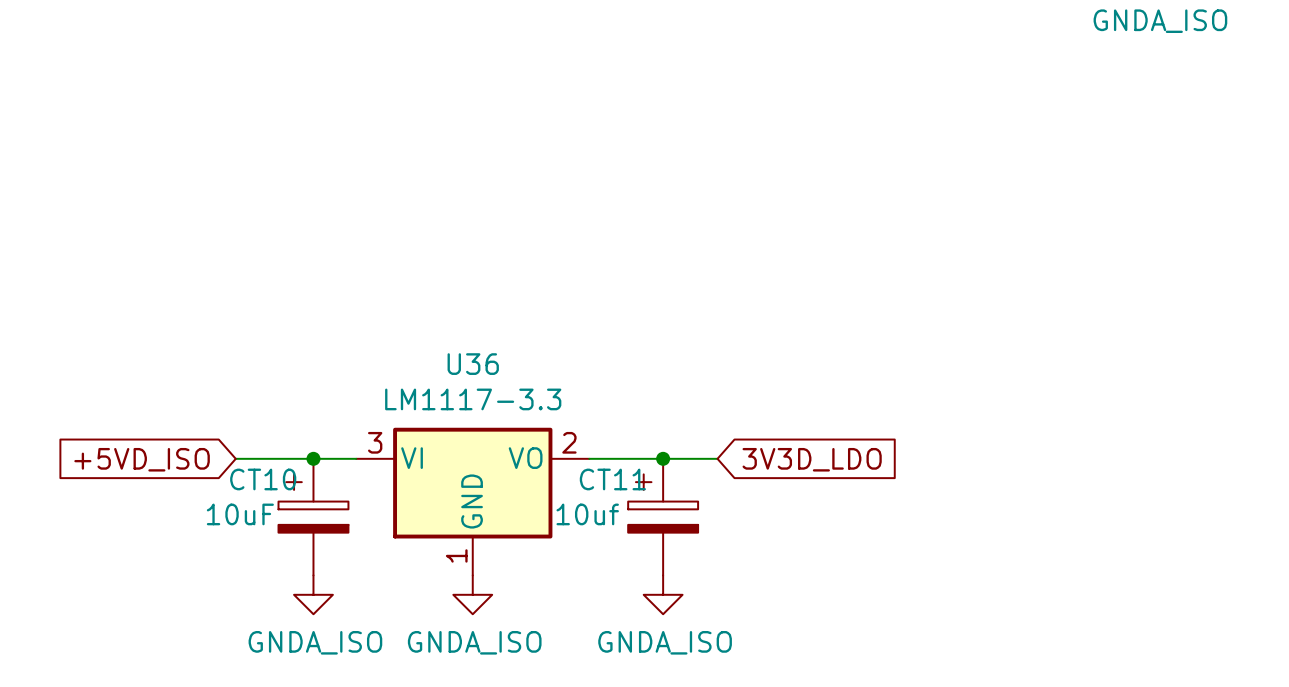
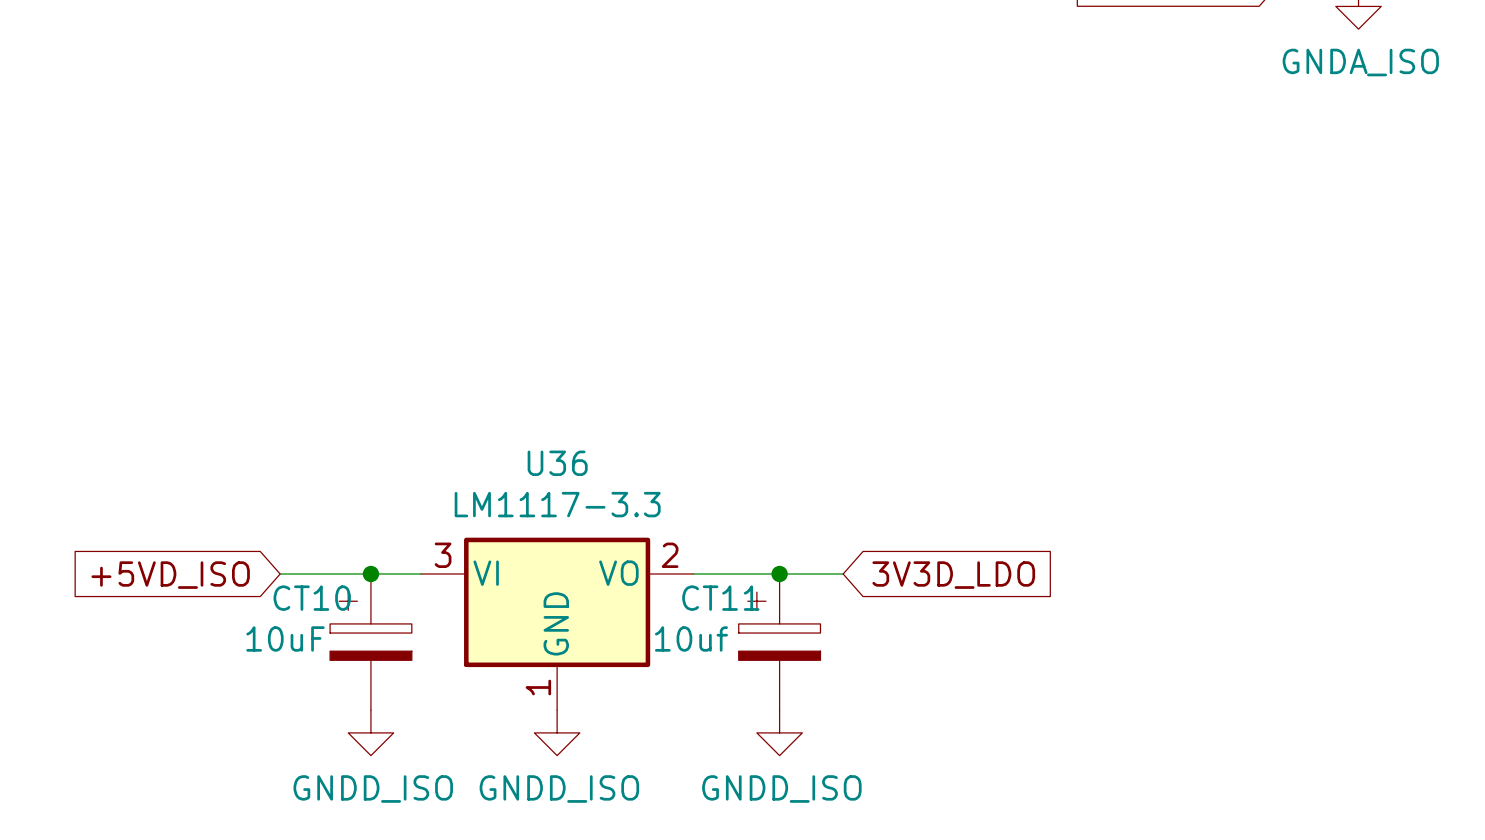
power symbol: GNDA_ISO (313, 594) -> GNDD_ISO (370, 732)
power symbol: GNDA_ISO (472, 594) -> GNDD_ISO (557, 732)
power symbol: GNDA_ISO (663, 594) -> GNDD_ISO (779, 732)

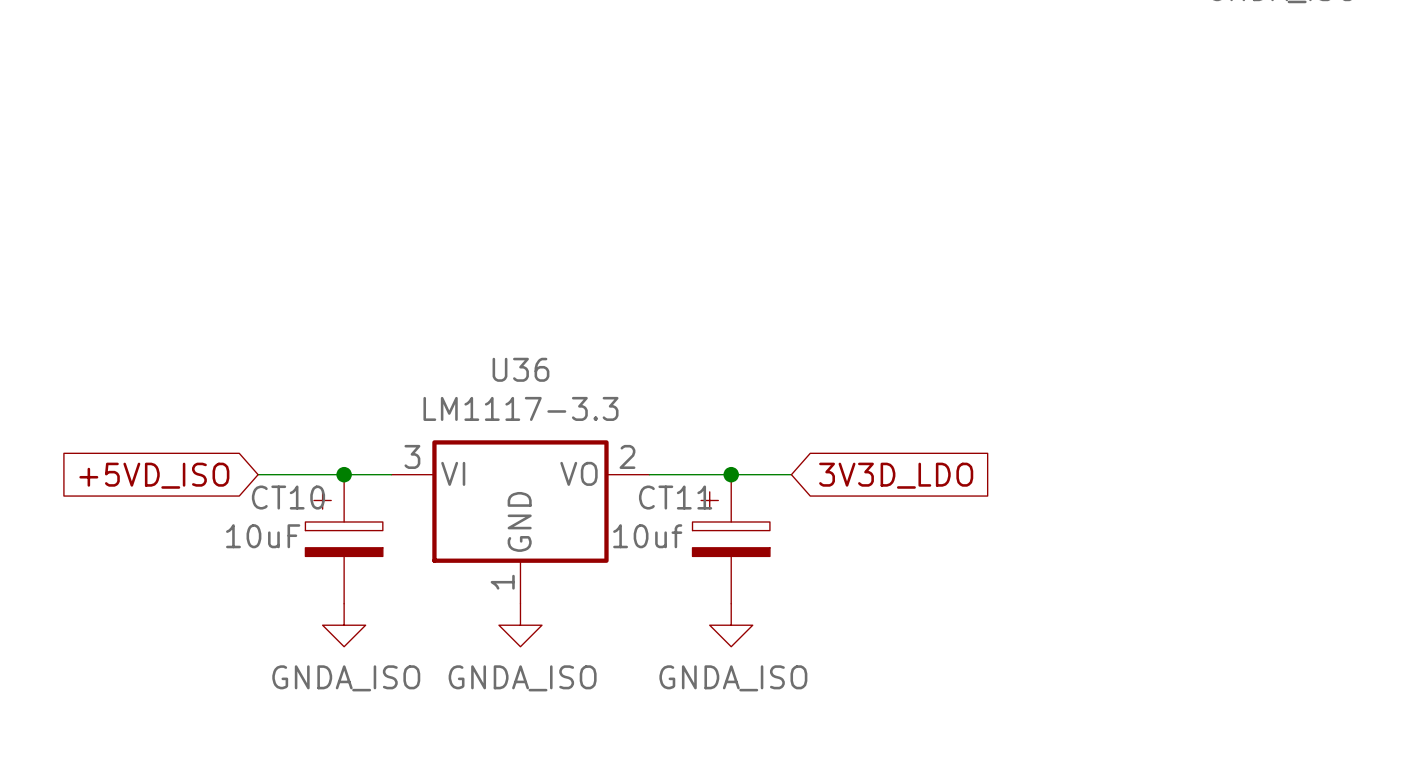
power symbol: GNDD_ISO (370, 732) -> GNDA_ISO (344, 625)
power symbol: GNDD_ISO (557, 732) -> GNDA_ISO (520, 625)
power symbol: GNDD_ISO (779, 732) -> GNDA_ISO (731, 625)

